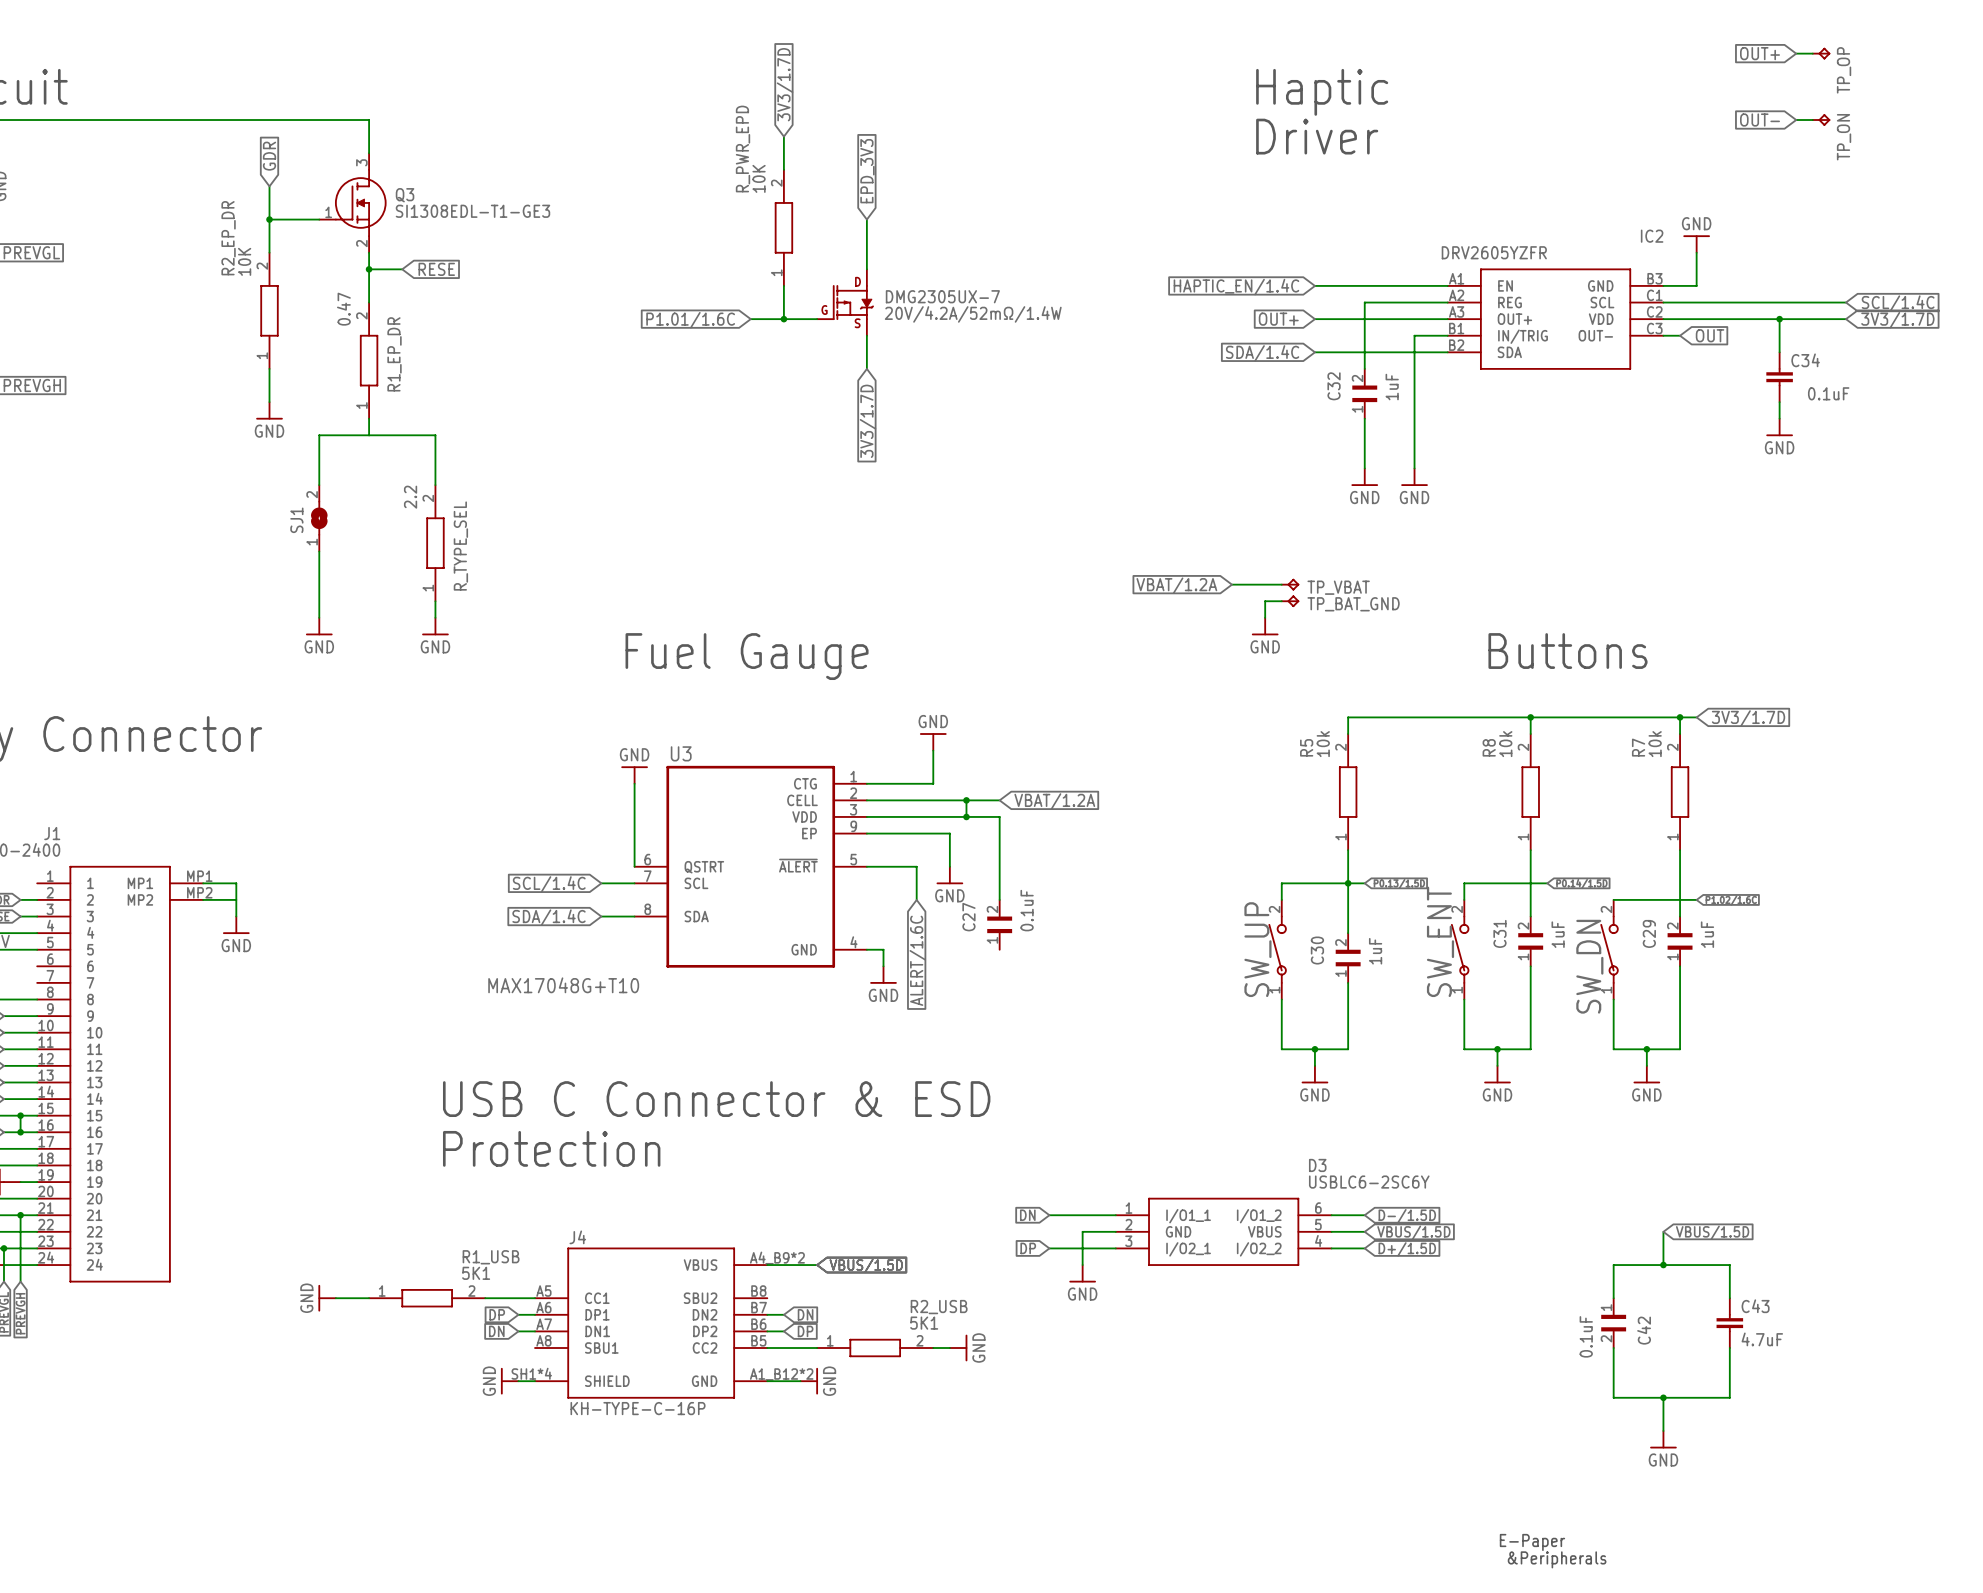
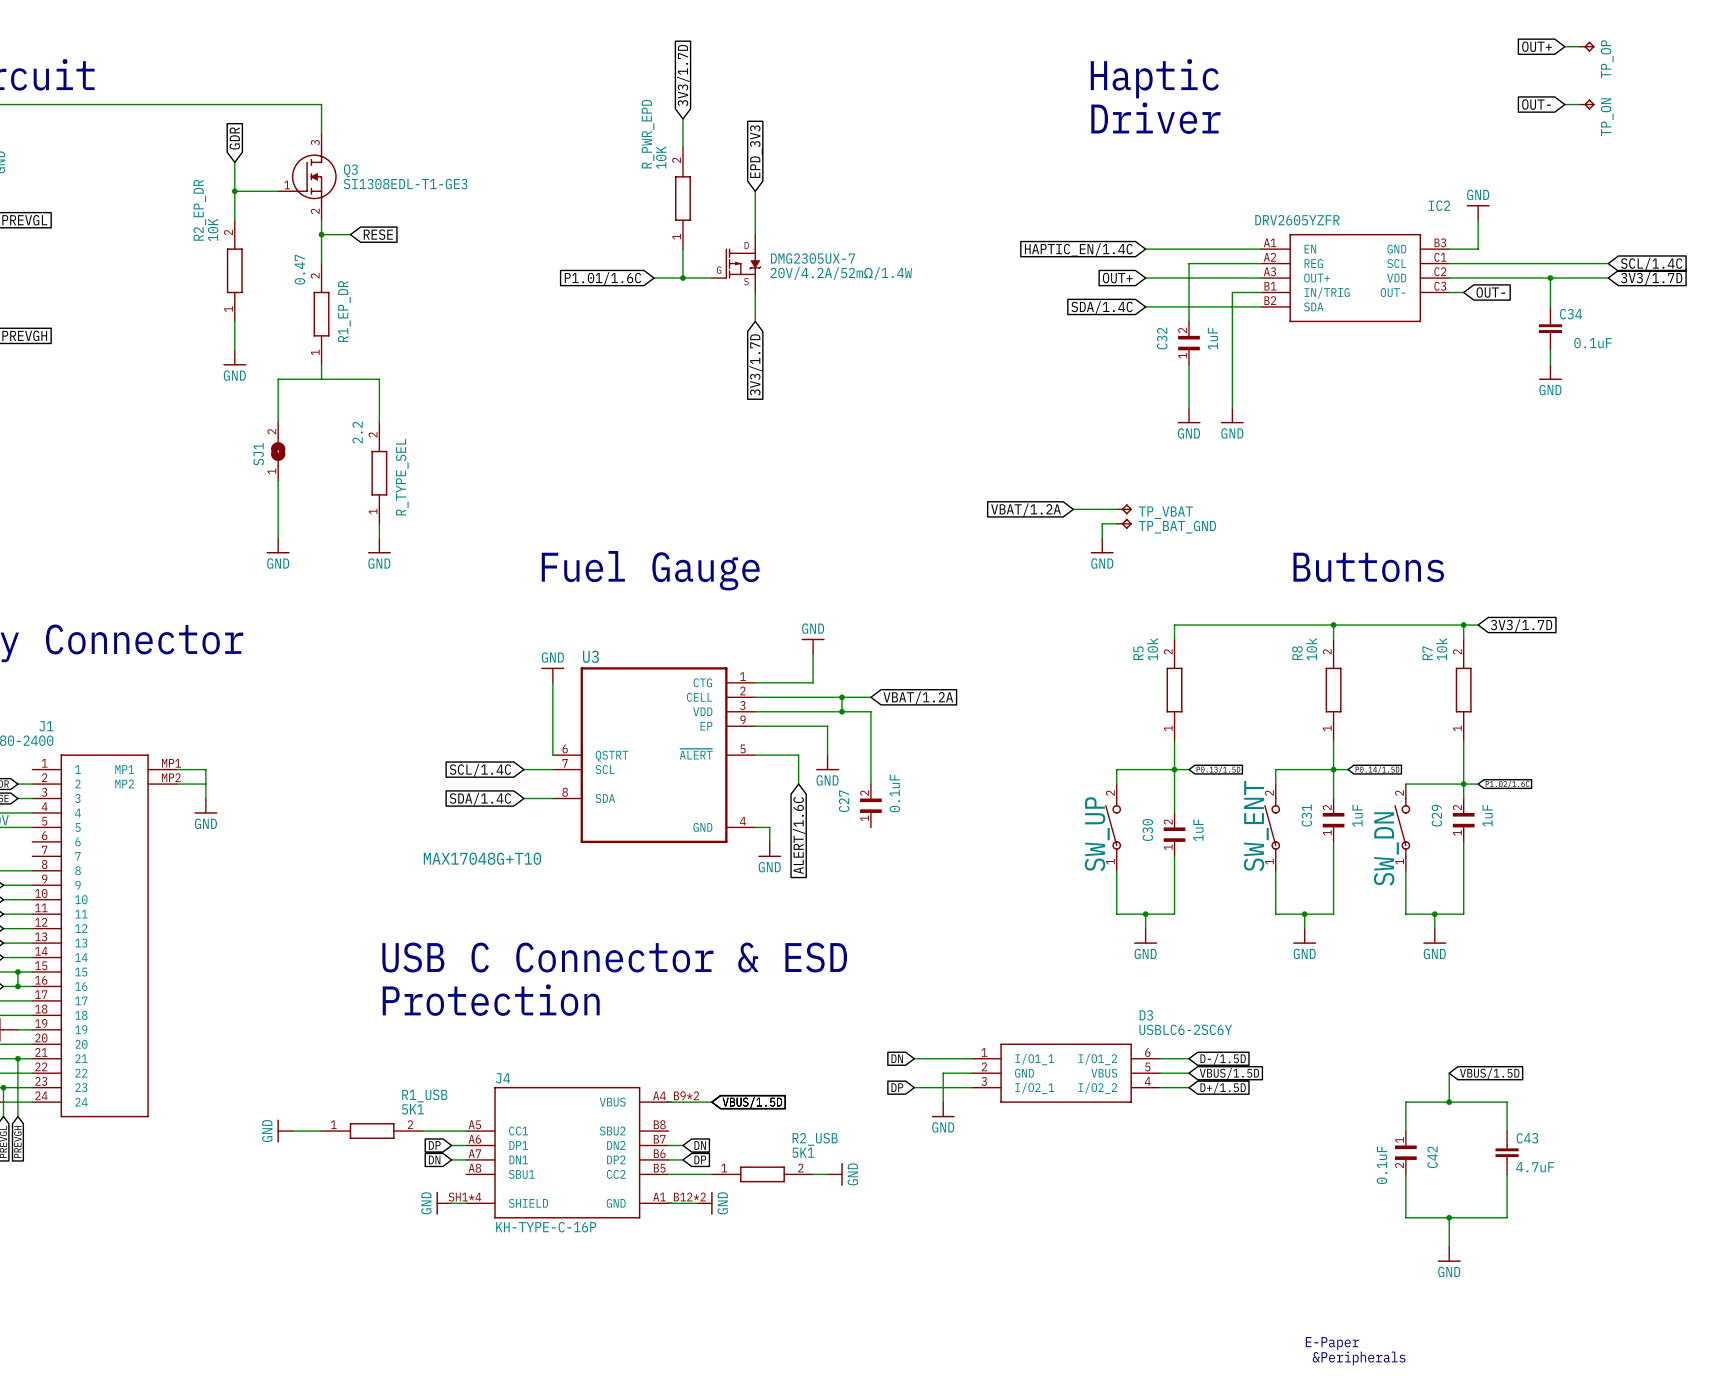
global label: OUT (1710, 335) -> OUT- (1490, 292)
junction: none -> (1333, 769)
junction: none -> (1463, 784)

